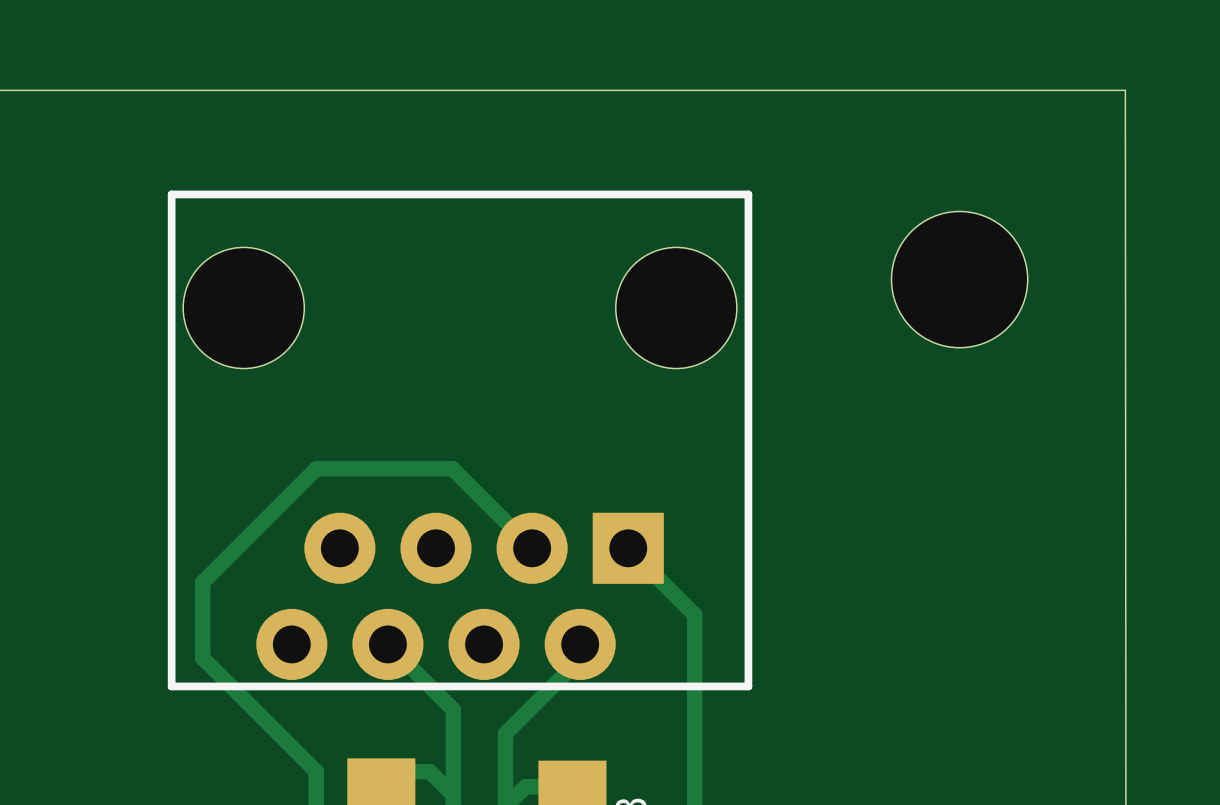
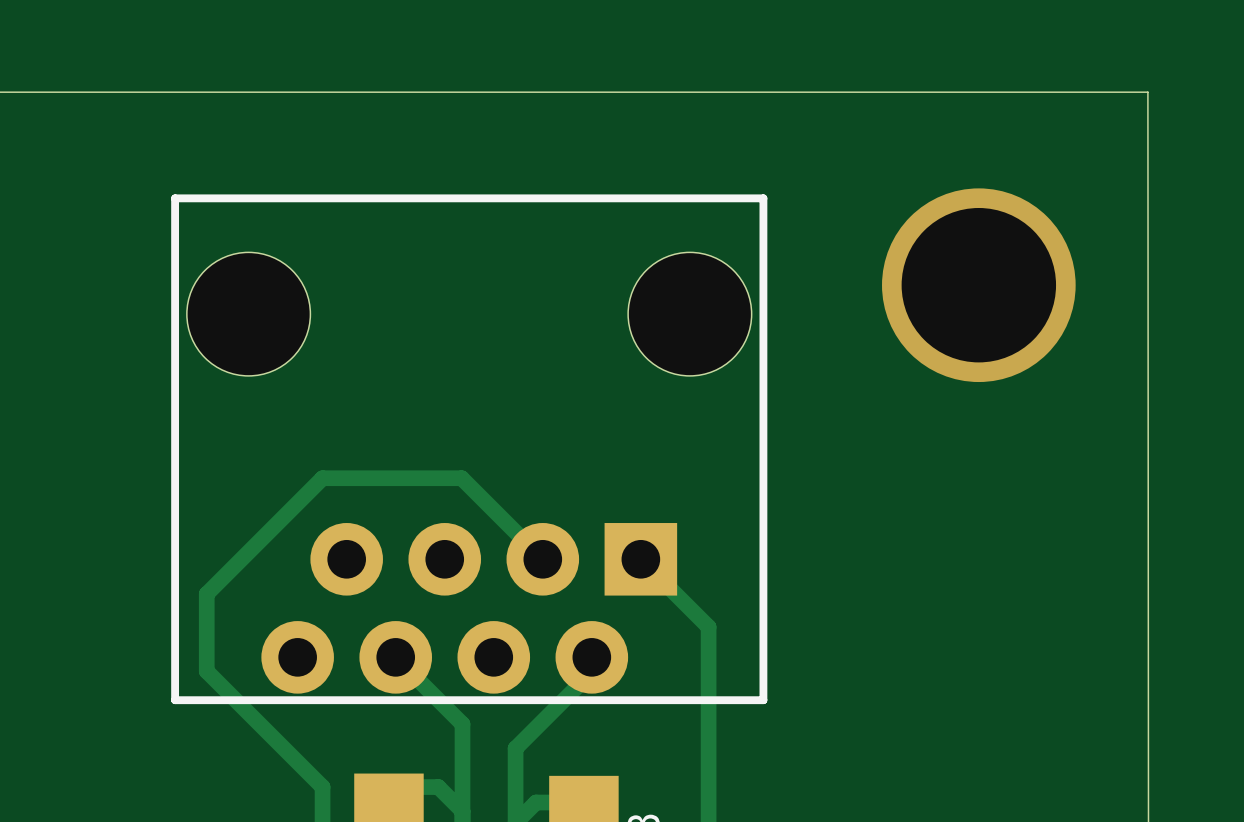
hole: (959, 279) -> none
via: none -> (978, 285)

